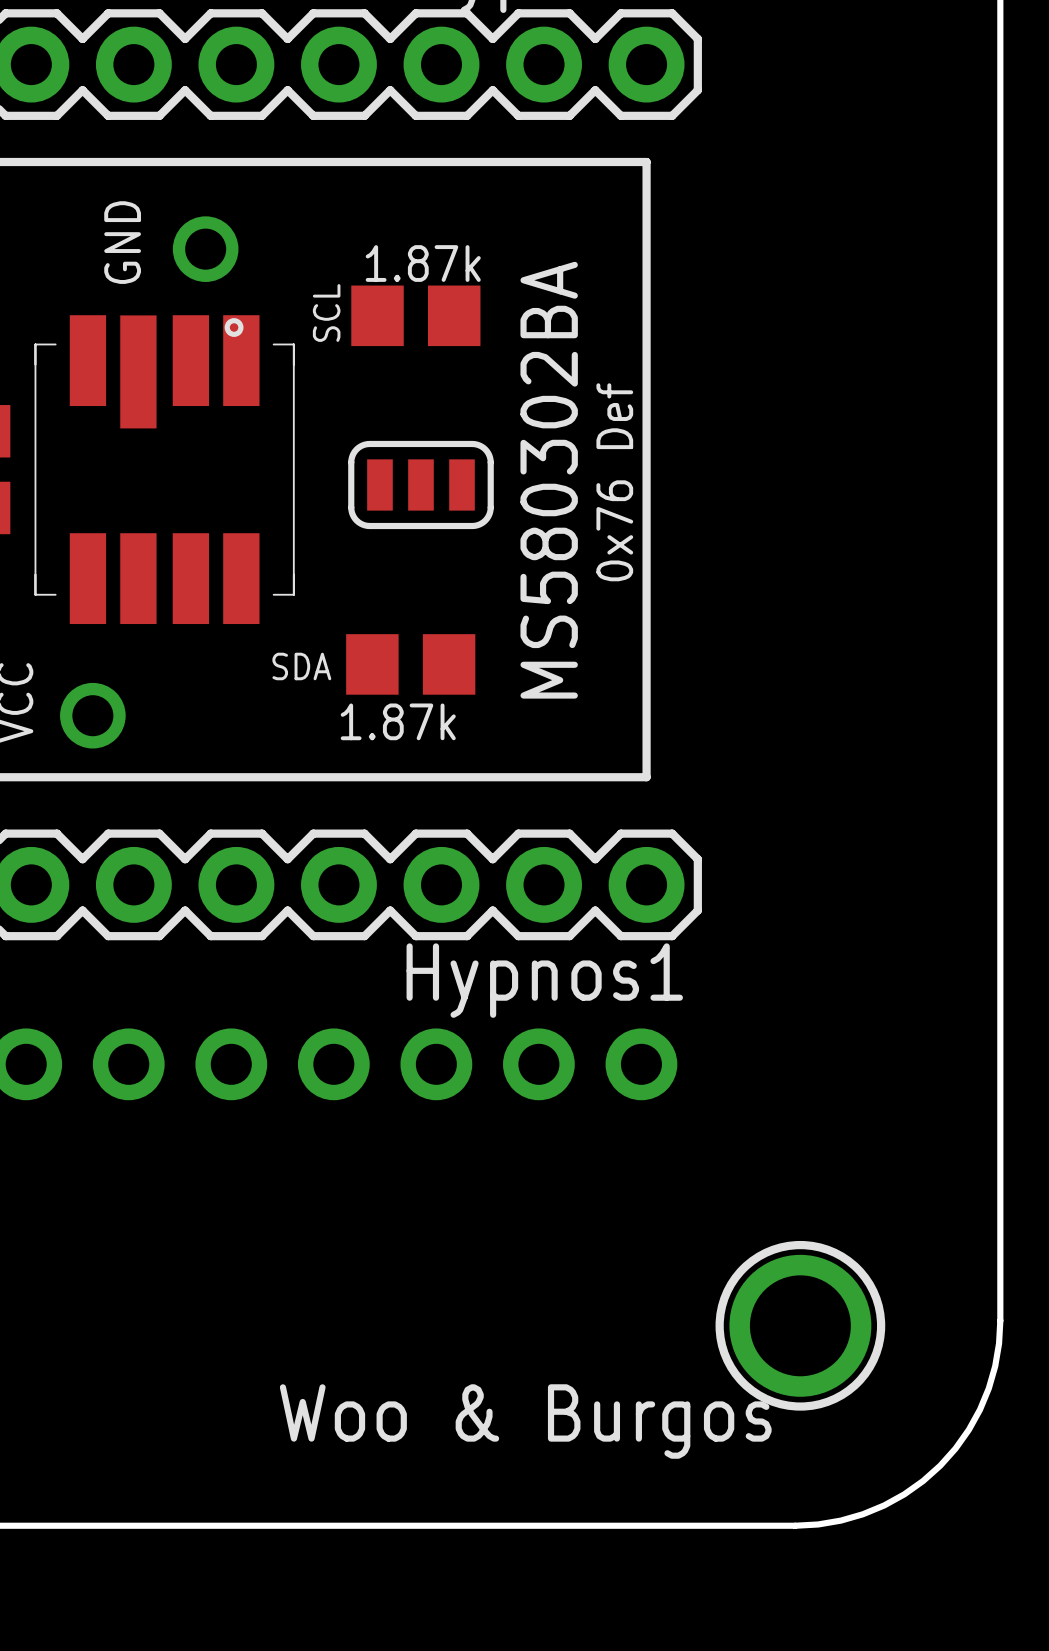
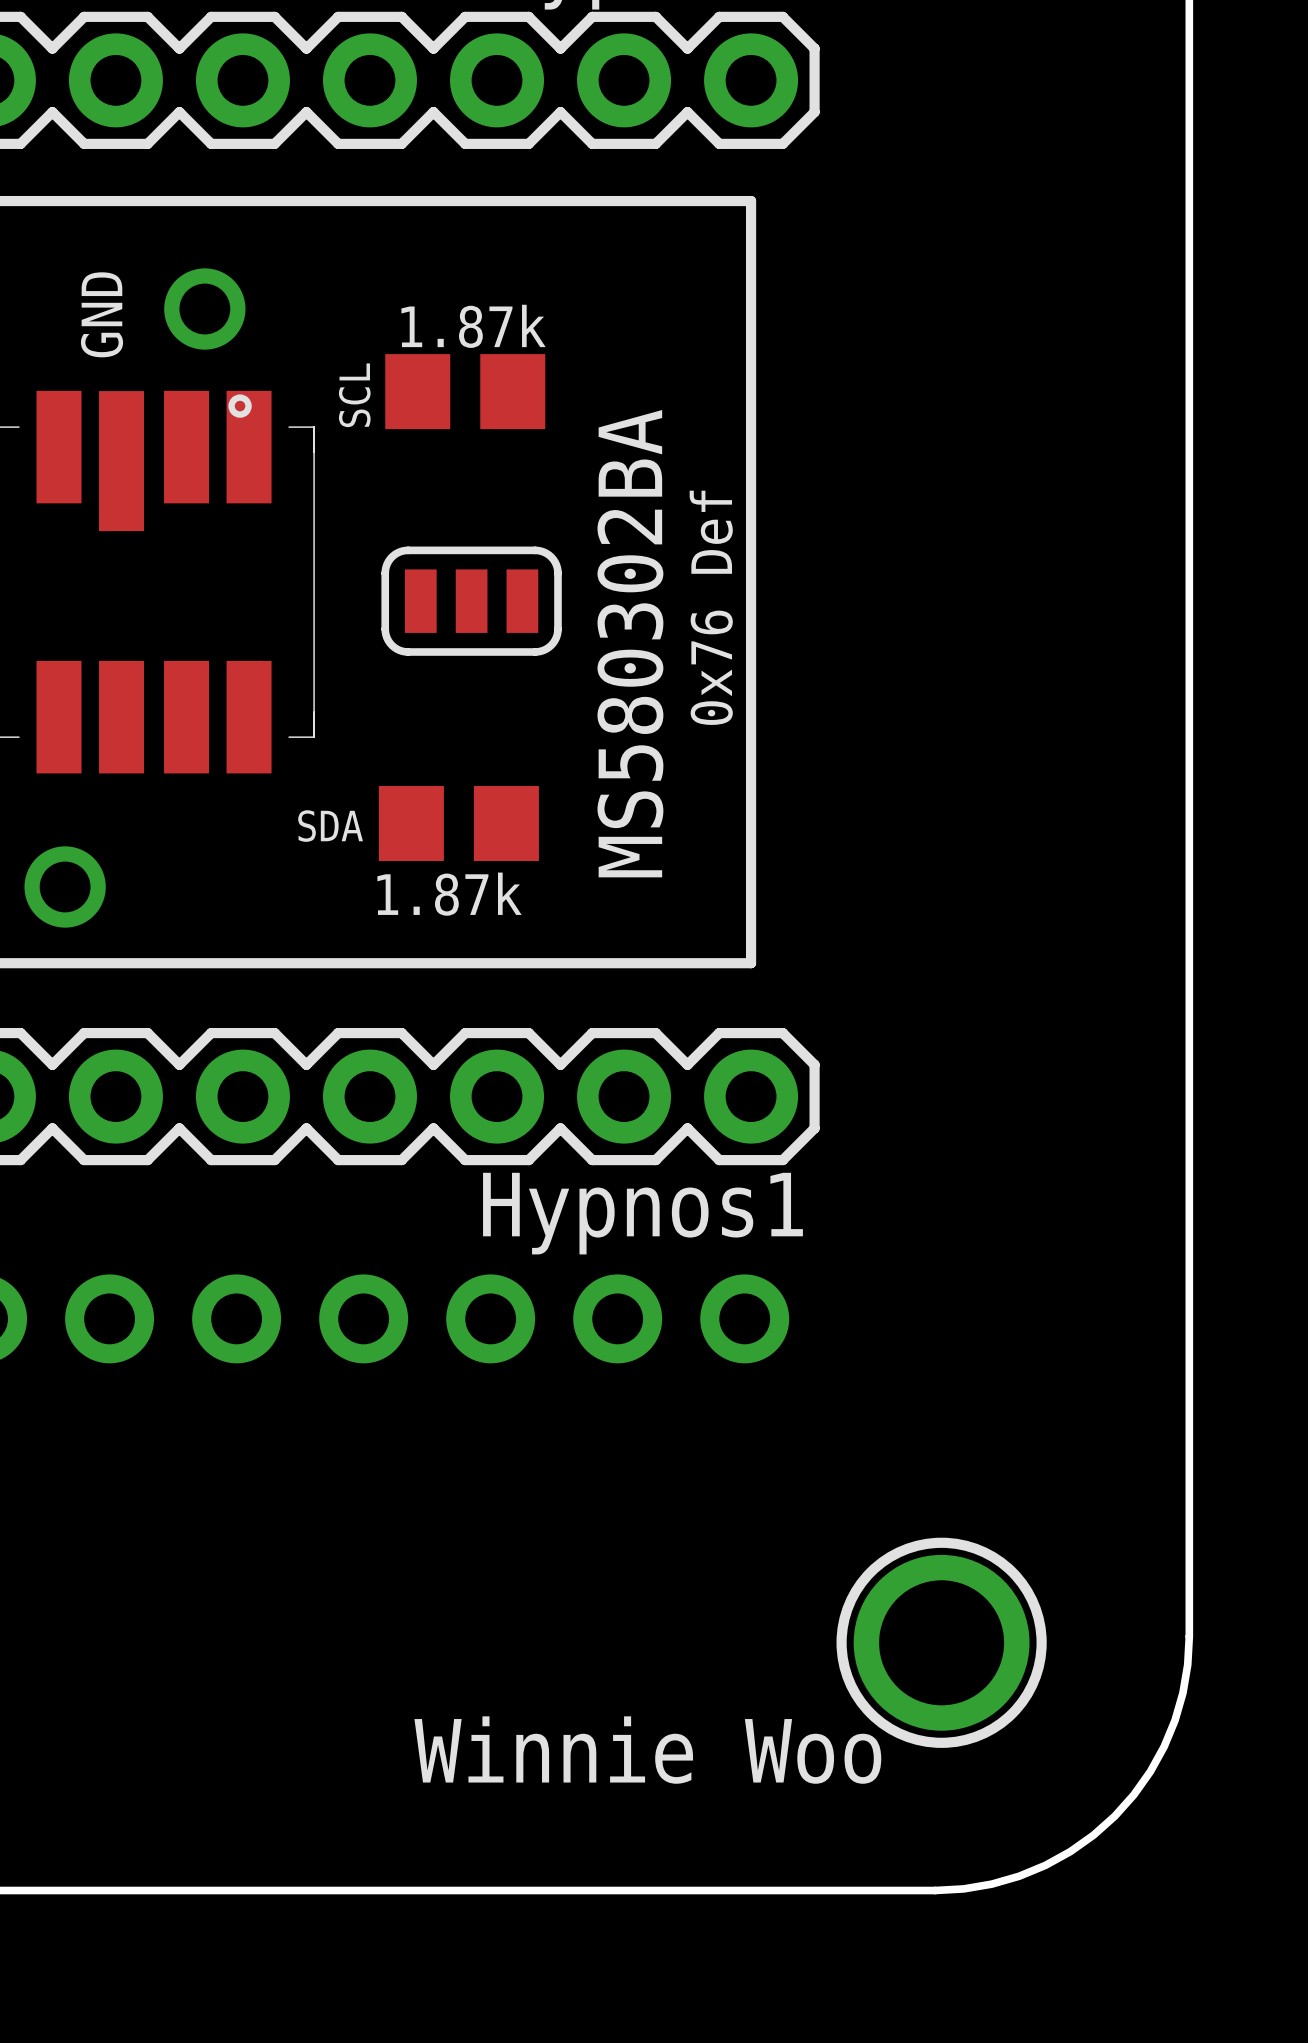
text: none -> Winnie Woo (647, 1750)
text: Woo & Burgos (525, 1421) -> none

